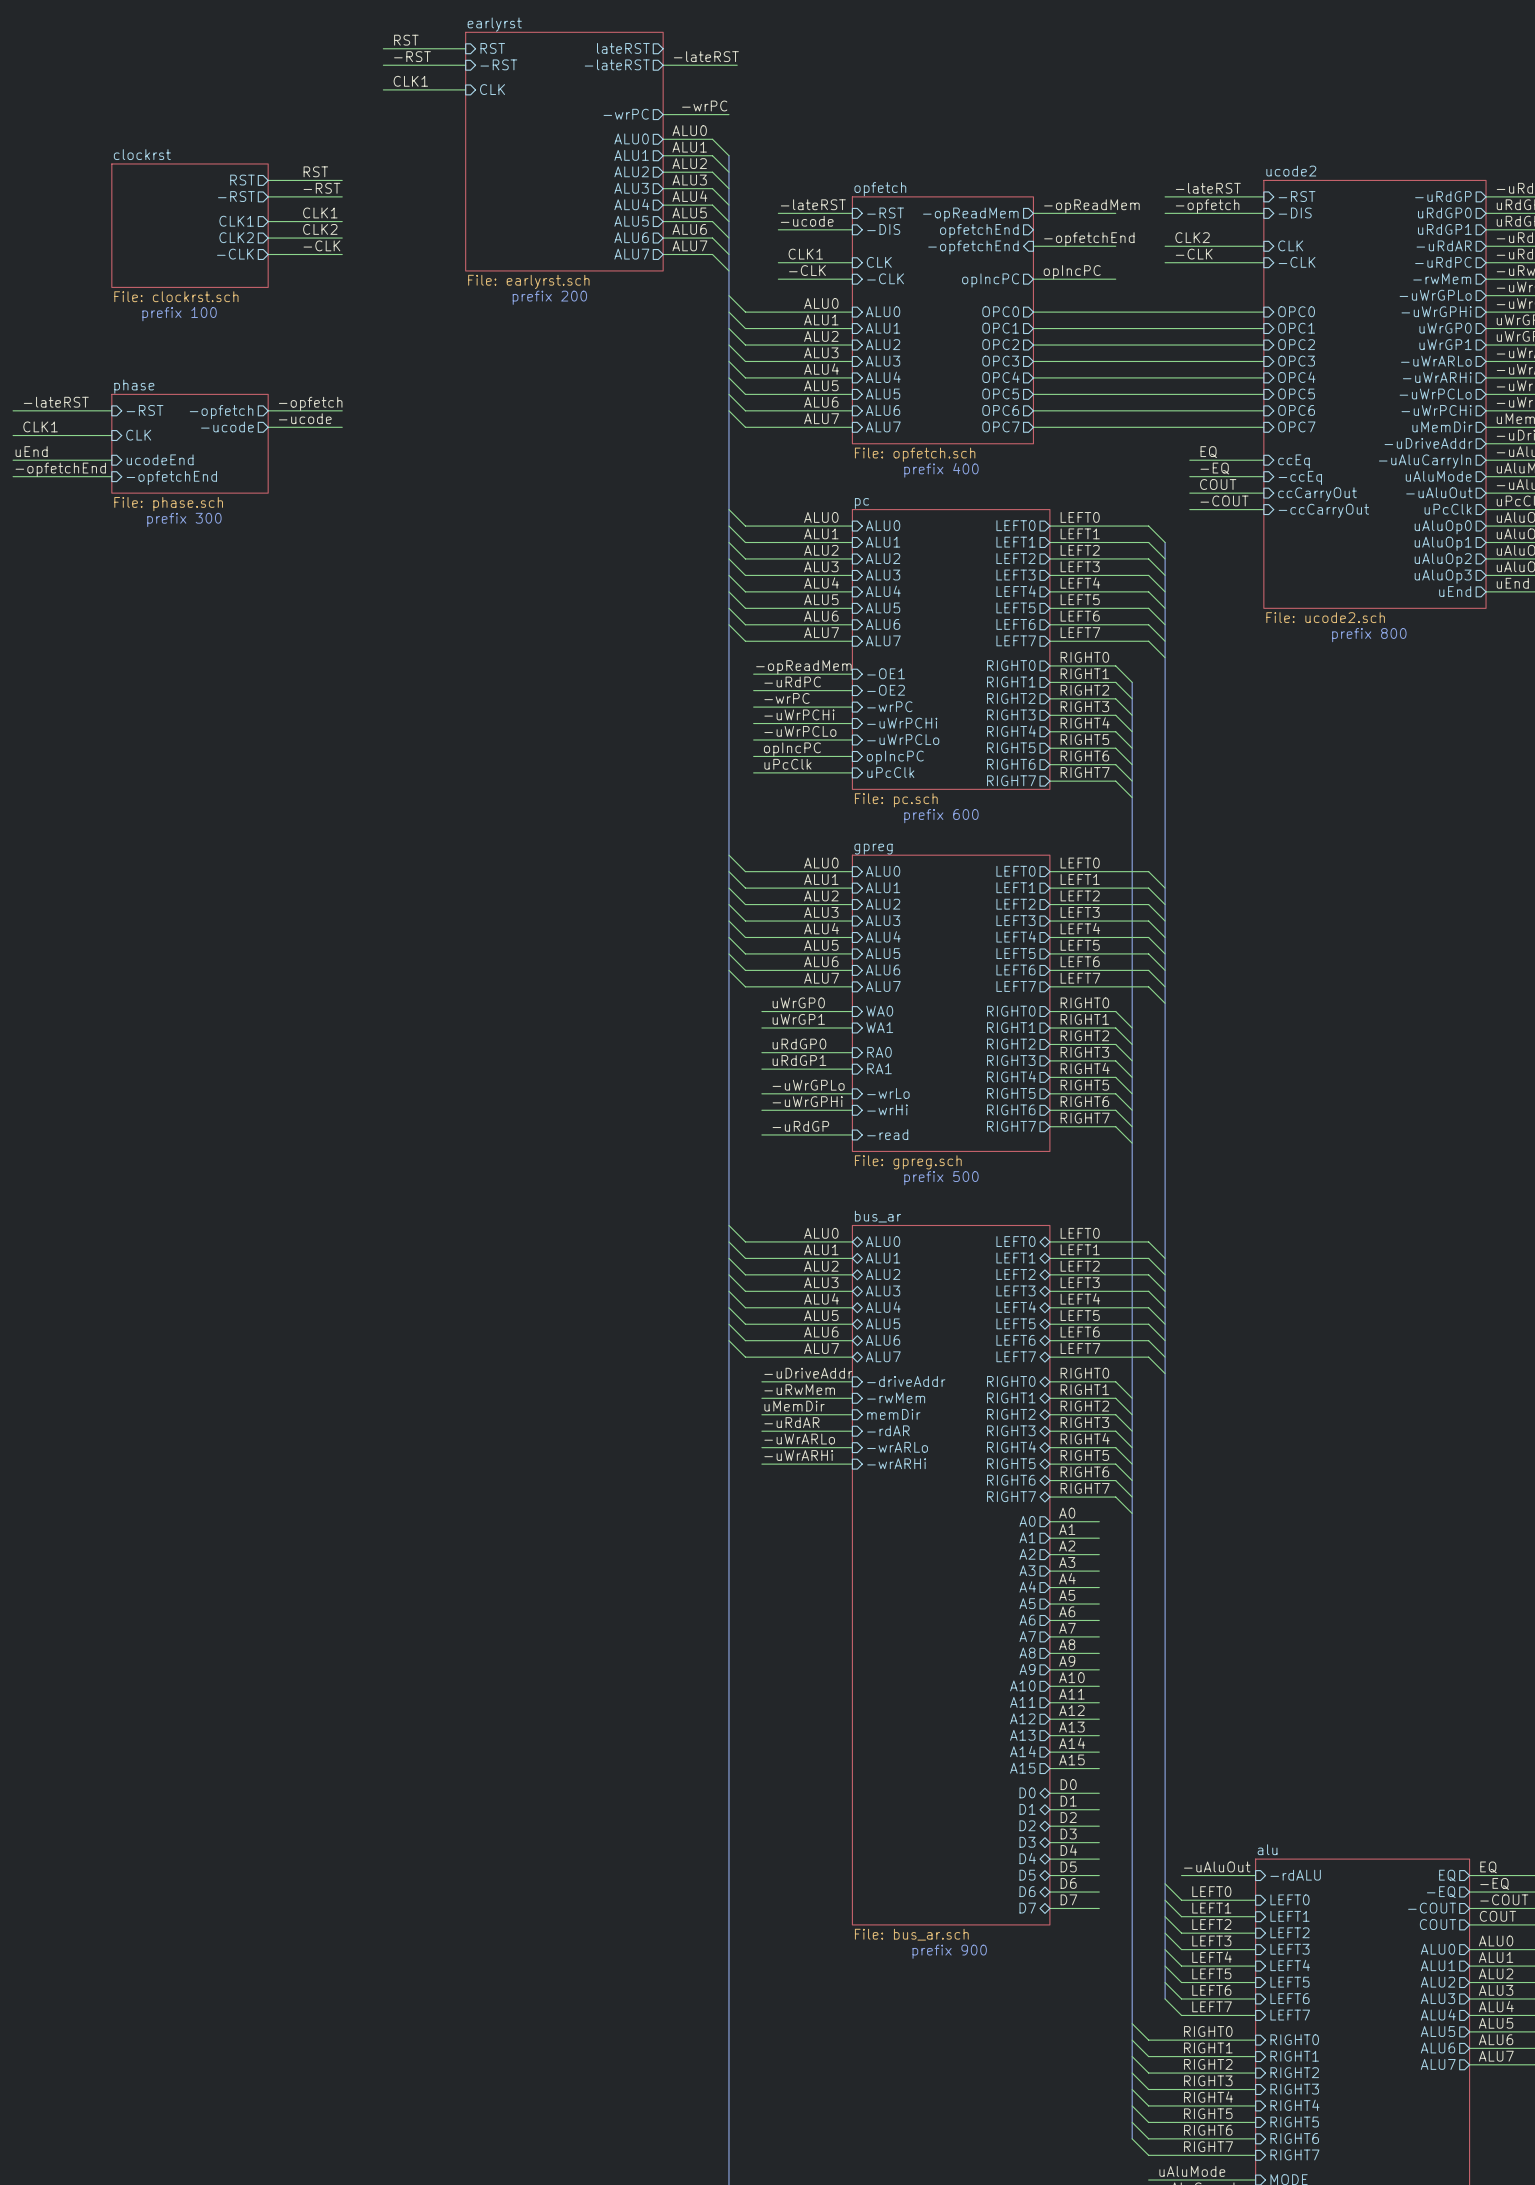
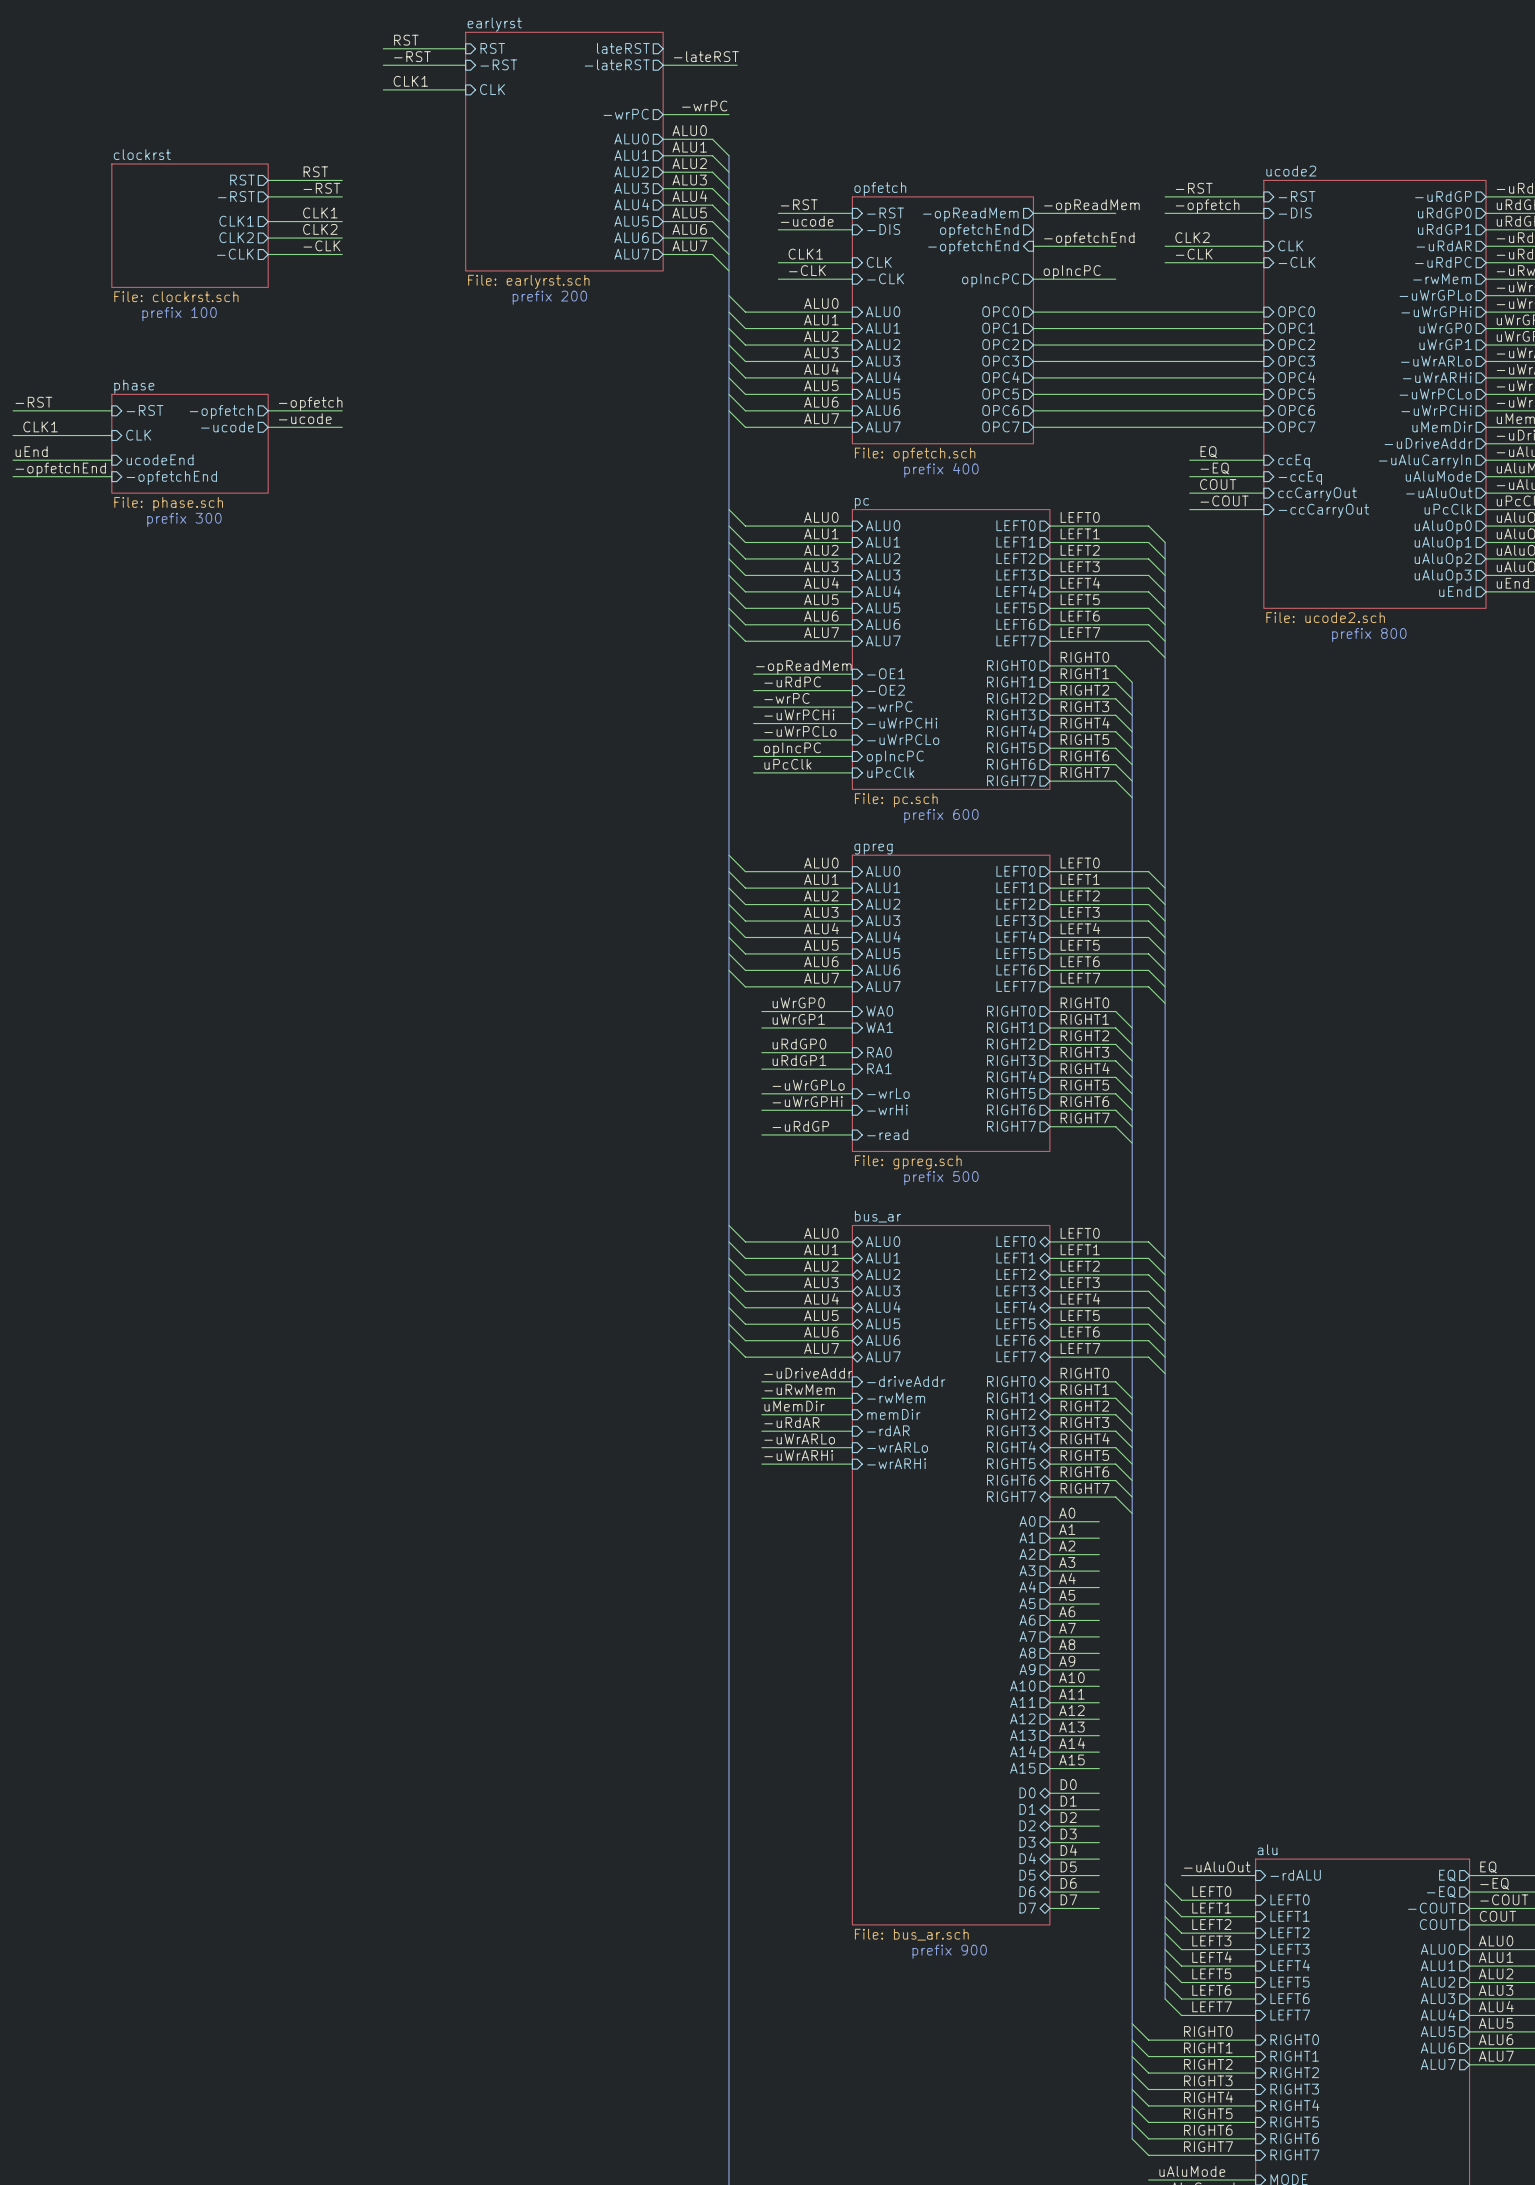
label: -lateRST (1208, 188) -> -RST (1194, 188)
label: -lateRST (813, 204) -> -RST (799, 204)
label: -lateRST (56, 402) -> -RST (33, 402)

